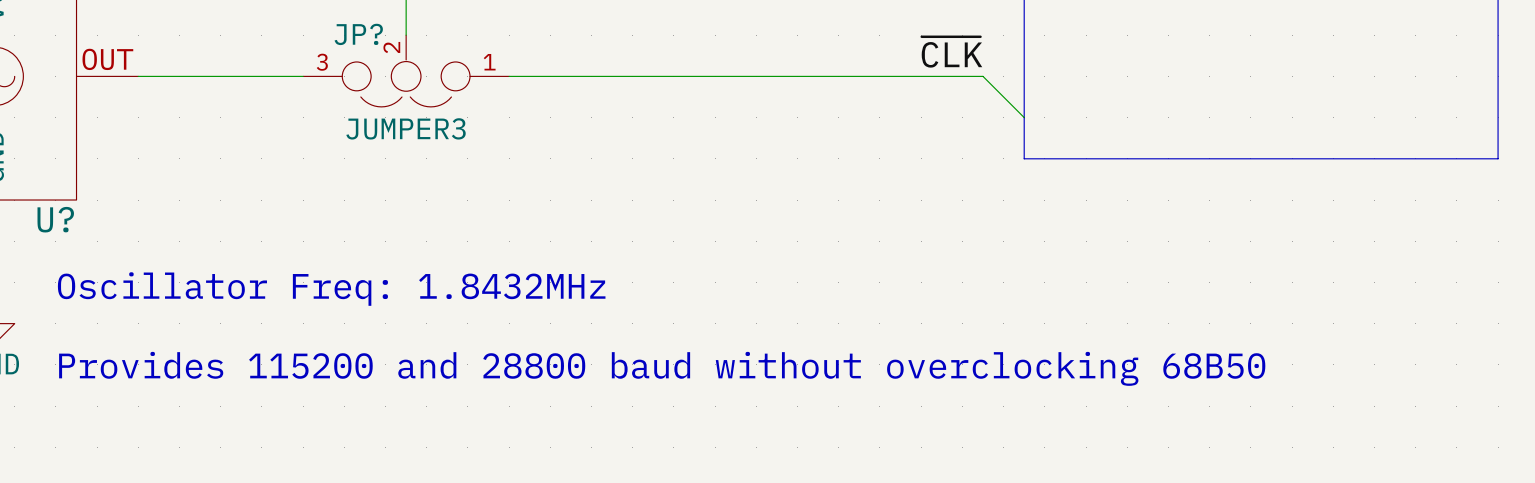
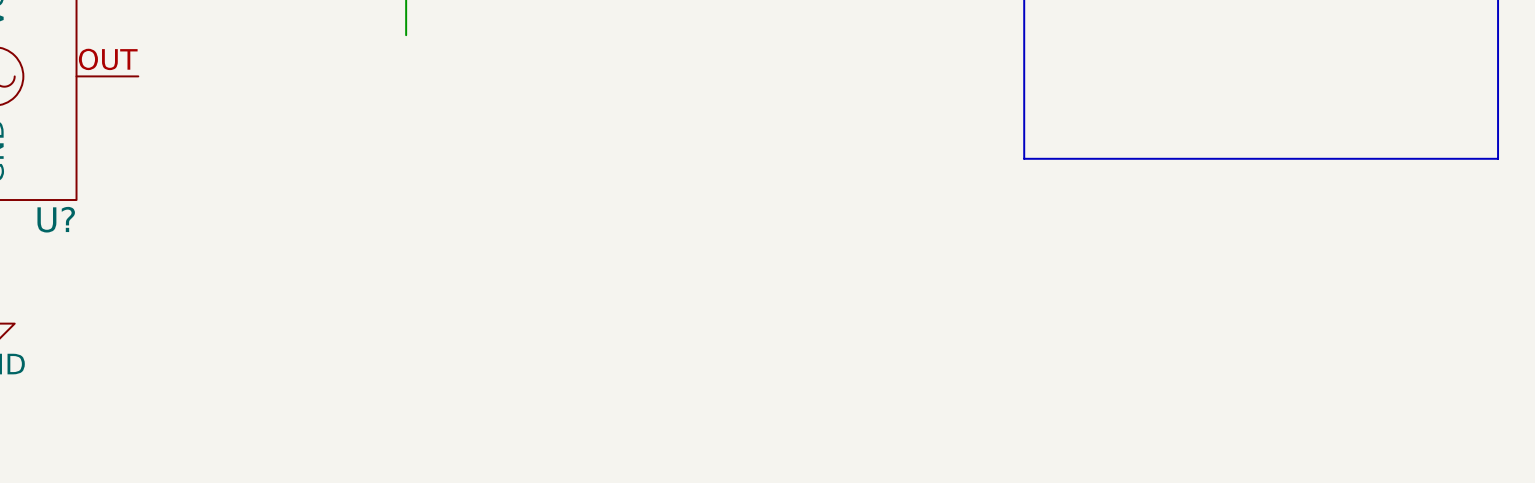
label: ~{CLK} (951, 52) -> none
JP?: JUMPER3 (406, 71) -> none
wire: (138, 76) (303, 76) -> none
wire: (509, 76) (983, 76) (1024, 117) -> none
text: Oscillator Freq: 1.8432MHz (331, 289) -> none
text: Provides 115200 and 28800 baud without overclocking 68B50 (662, 368) -> none

